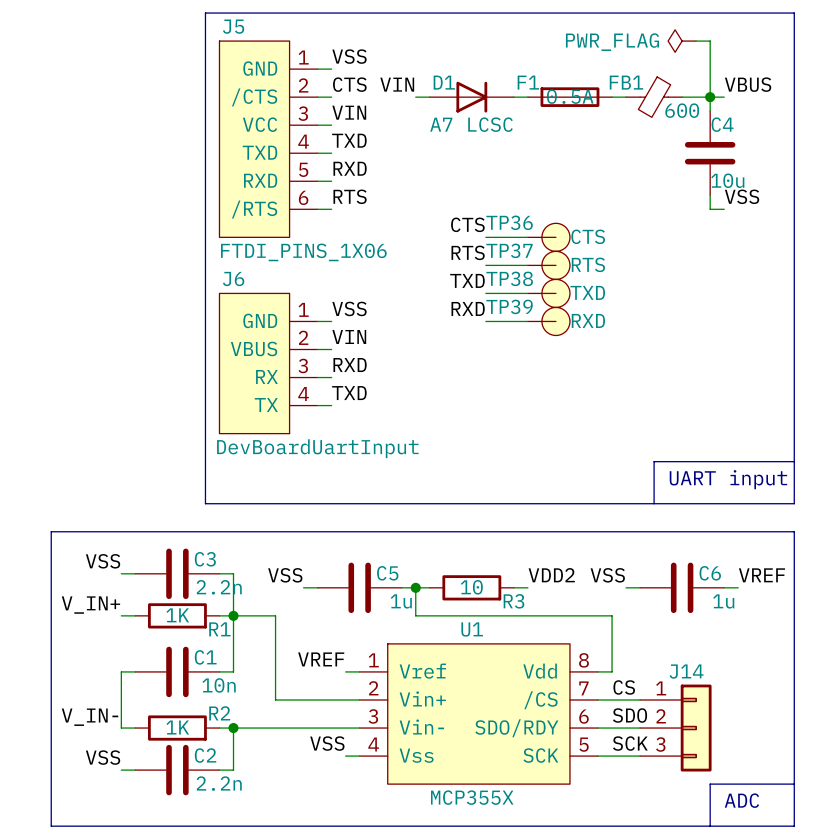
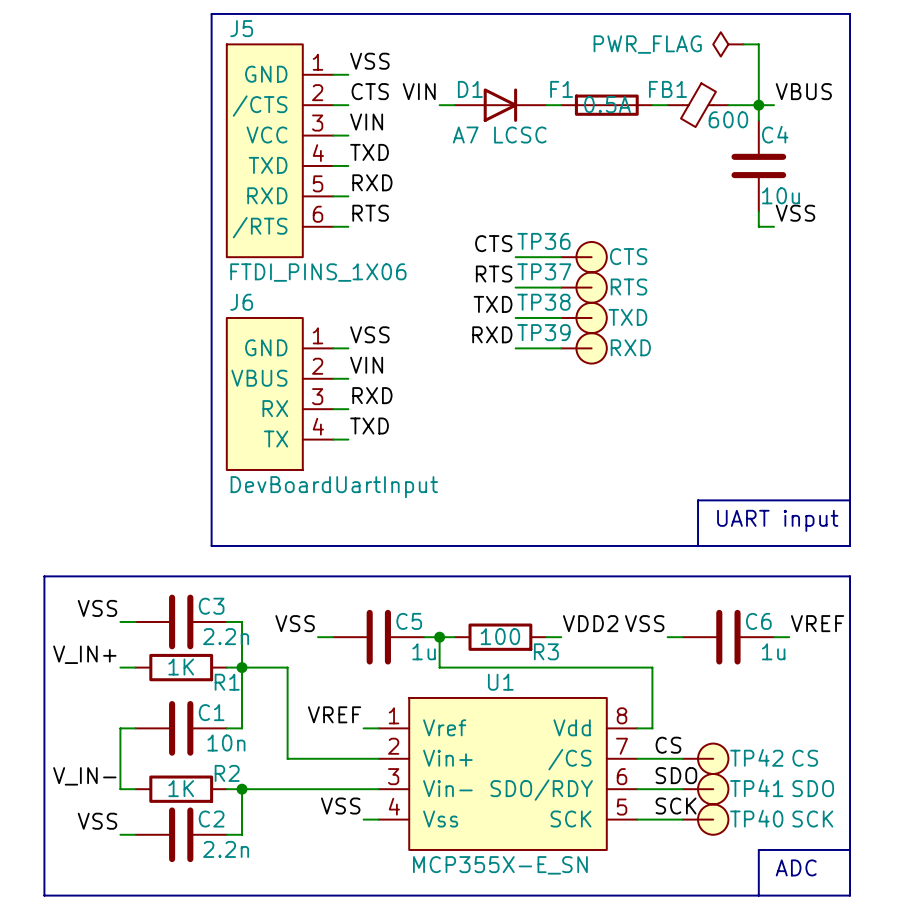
R3 value: 10 (471, 587) -> 100 (500, 636)
TP42: none -> CS (705, 758)
TP41: none -> SDO (705, 789)
J14: (675, 728) -> none
TP40: none -> SCK (705, 819)
U1 value: MCP355X (472, 797) -> MCP355X-E_SN (500, 865)

